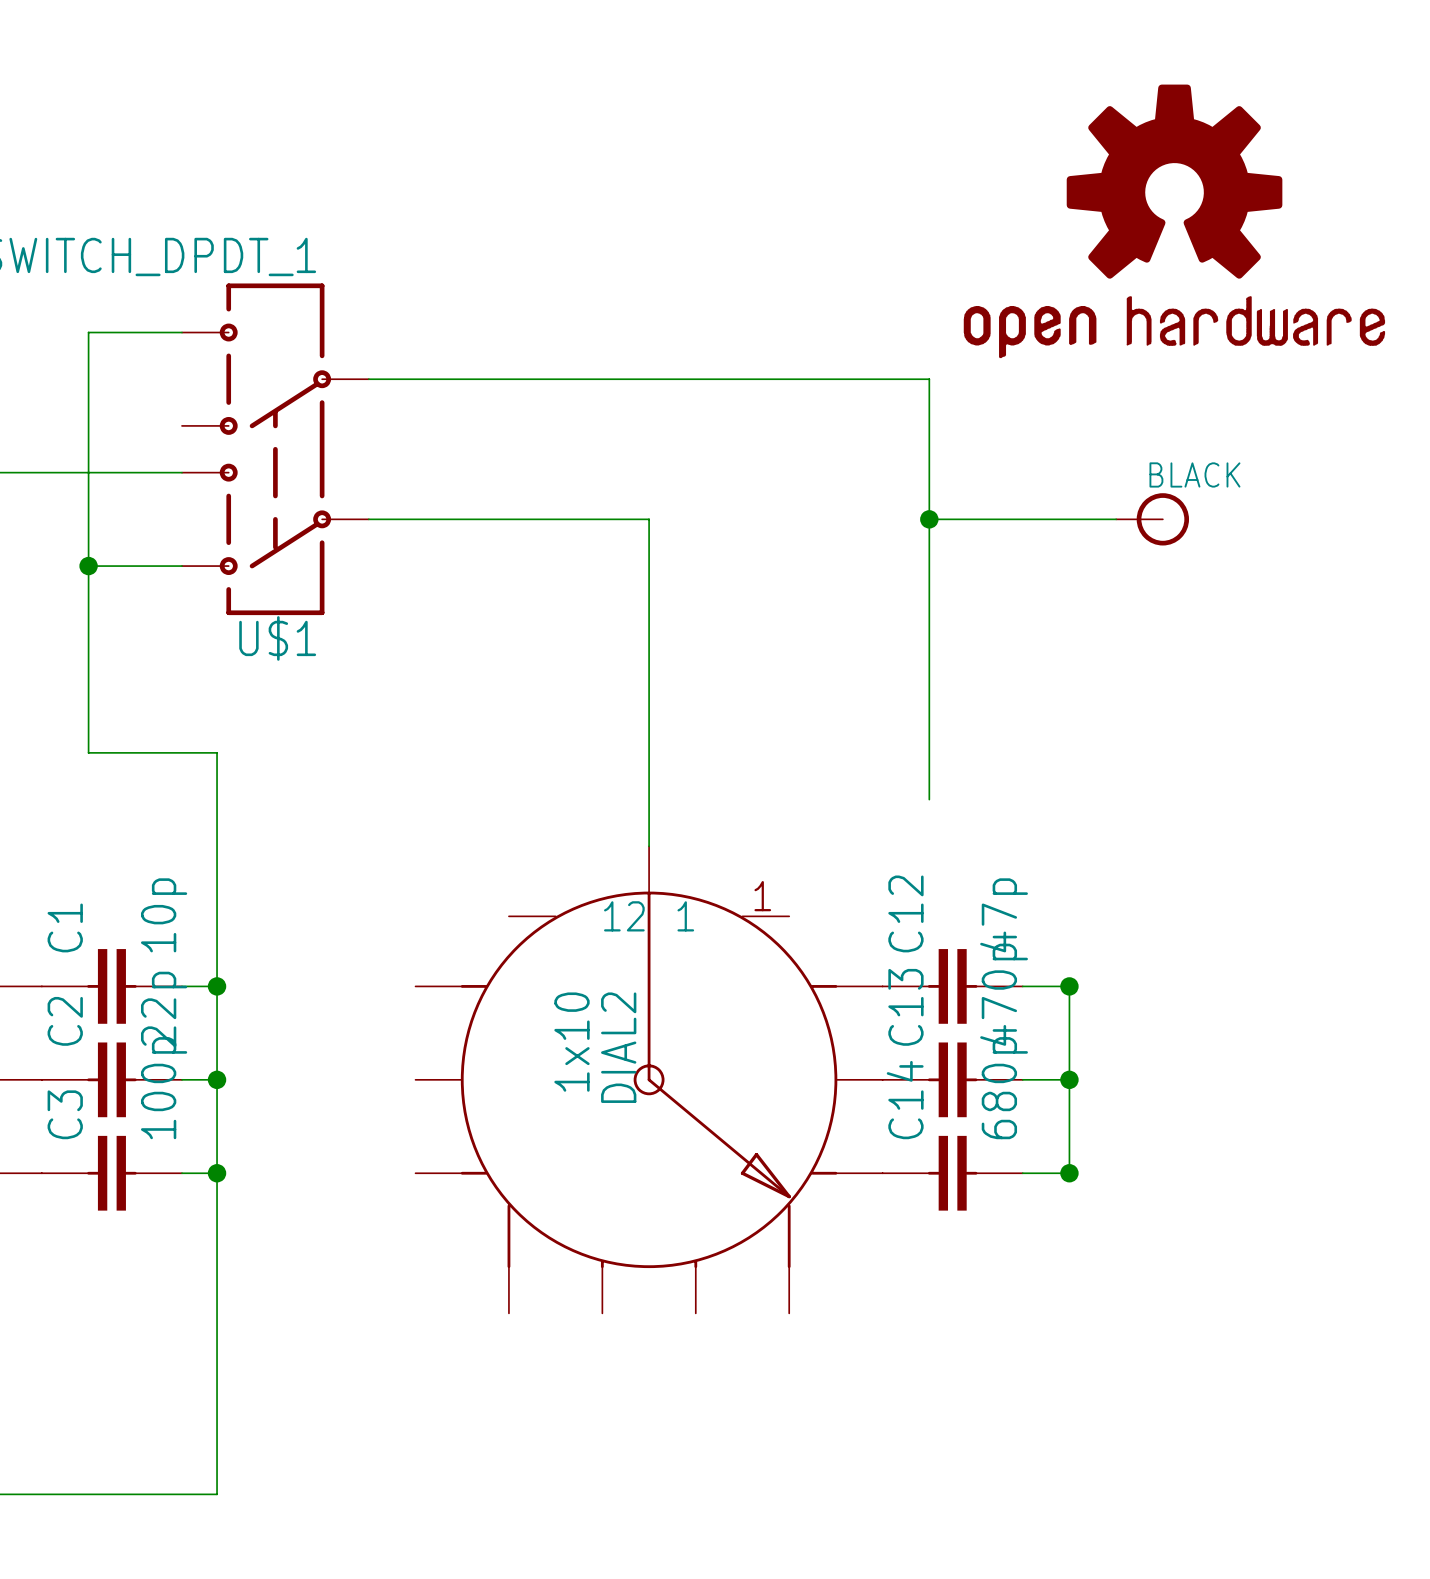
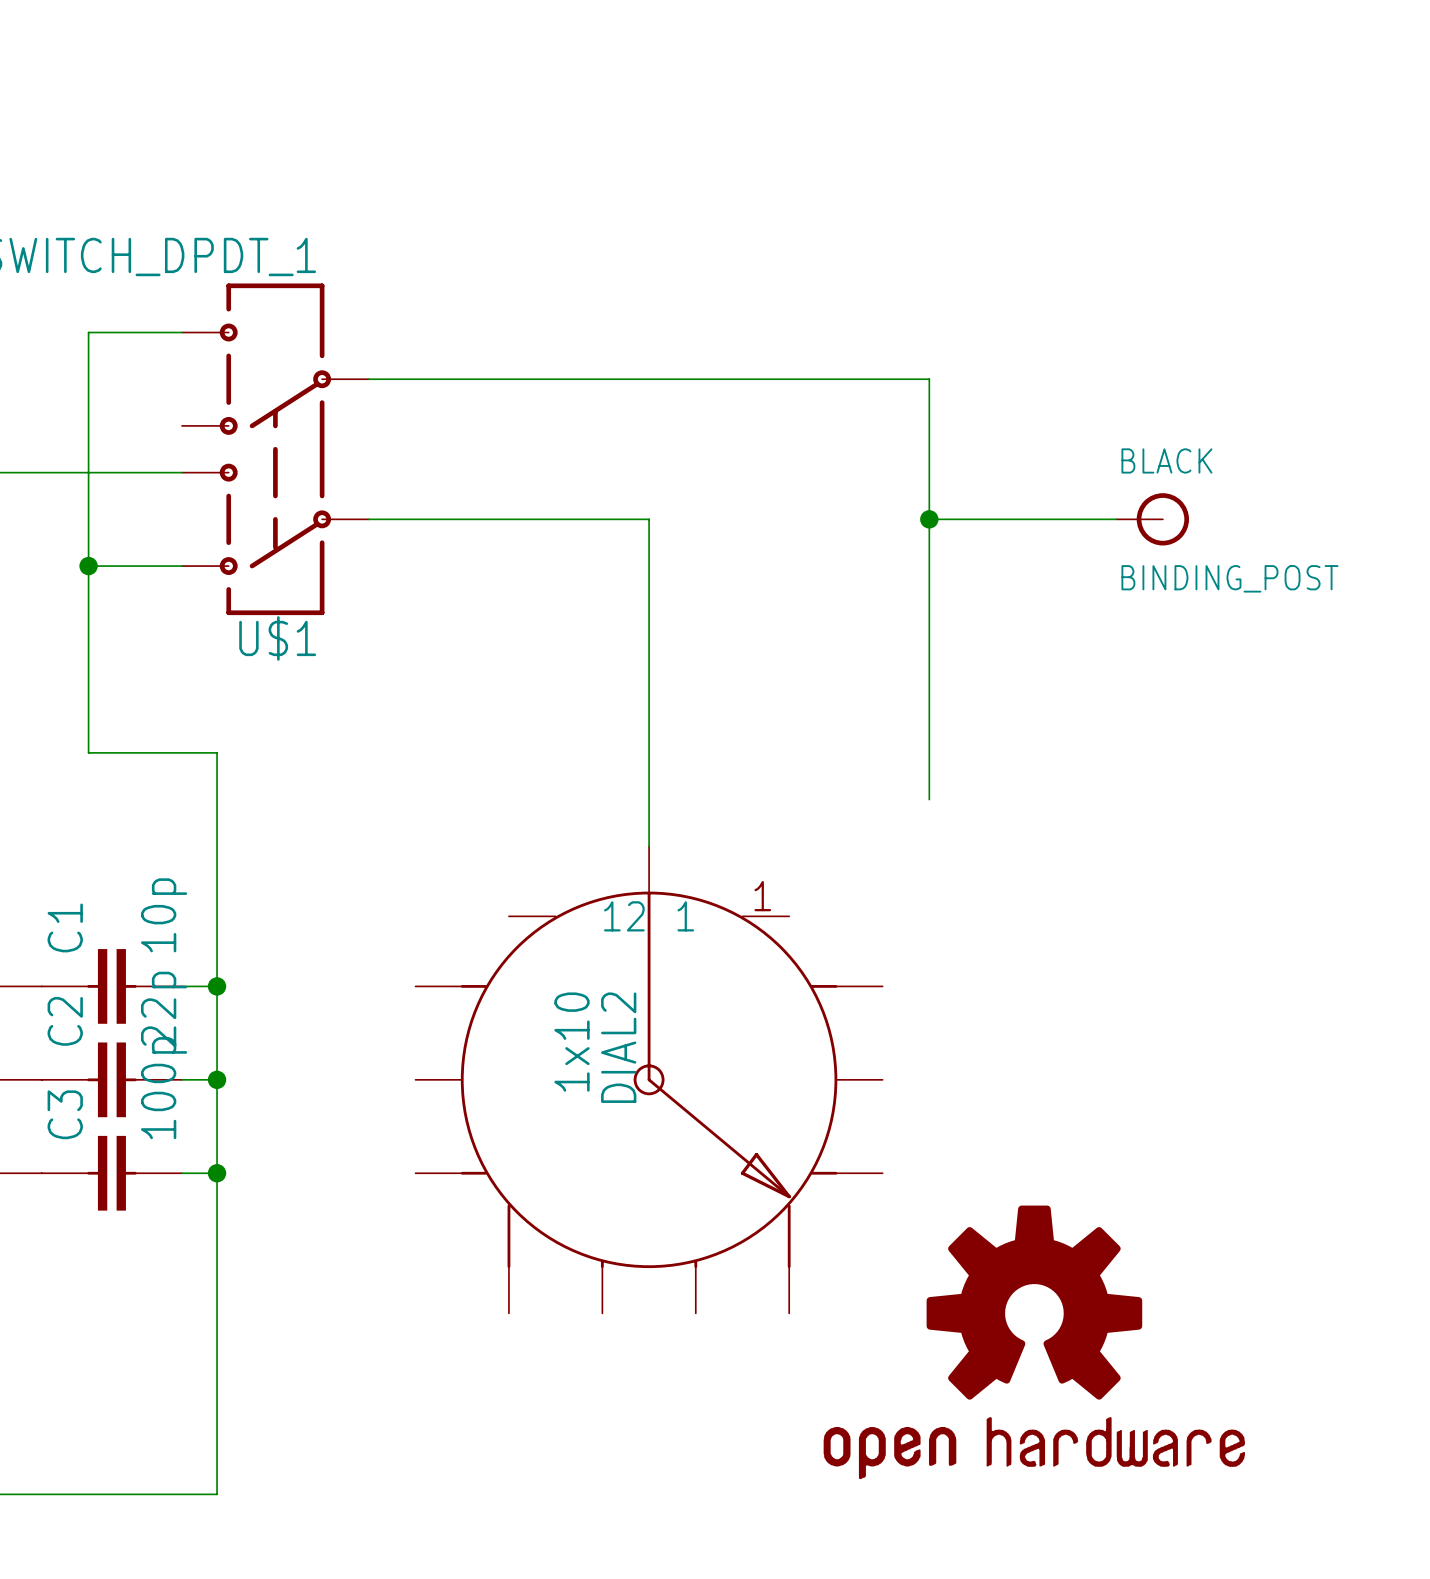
part: (1174, 221) -> none
BLACK name position: BLACK (1194, 474) -> BLACK (1166, 460)
BLACK value: none -> BINDING_POST (1229, 578)
C12: 47p (952, 986) -> none
wire: (1022, 986) (1069, 986) (1069, 1173) (1022, 1173) -> none
junction: (1069, 986) -> none
C13: 470p (952, 1079) -> none
wire: (1022, 1079) (1069, 1079) -> none
junction: (1069, 1079) -> none
C14: 680p (952, 1173) -> none
junction: (1069, 1173) -> none
part: none -> (1034, 1342)

